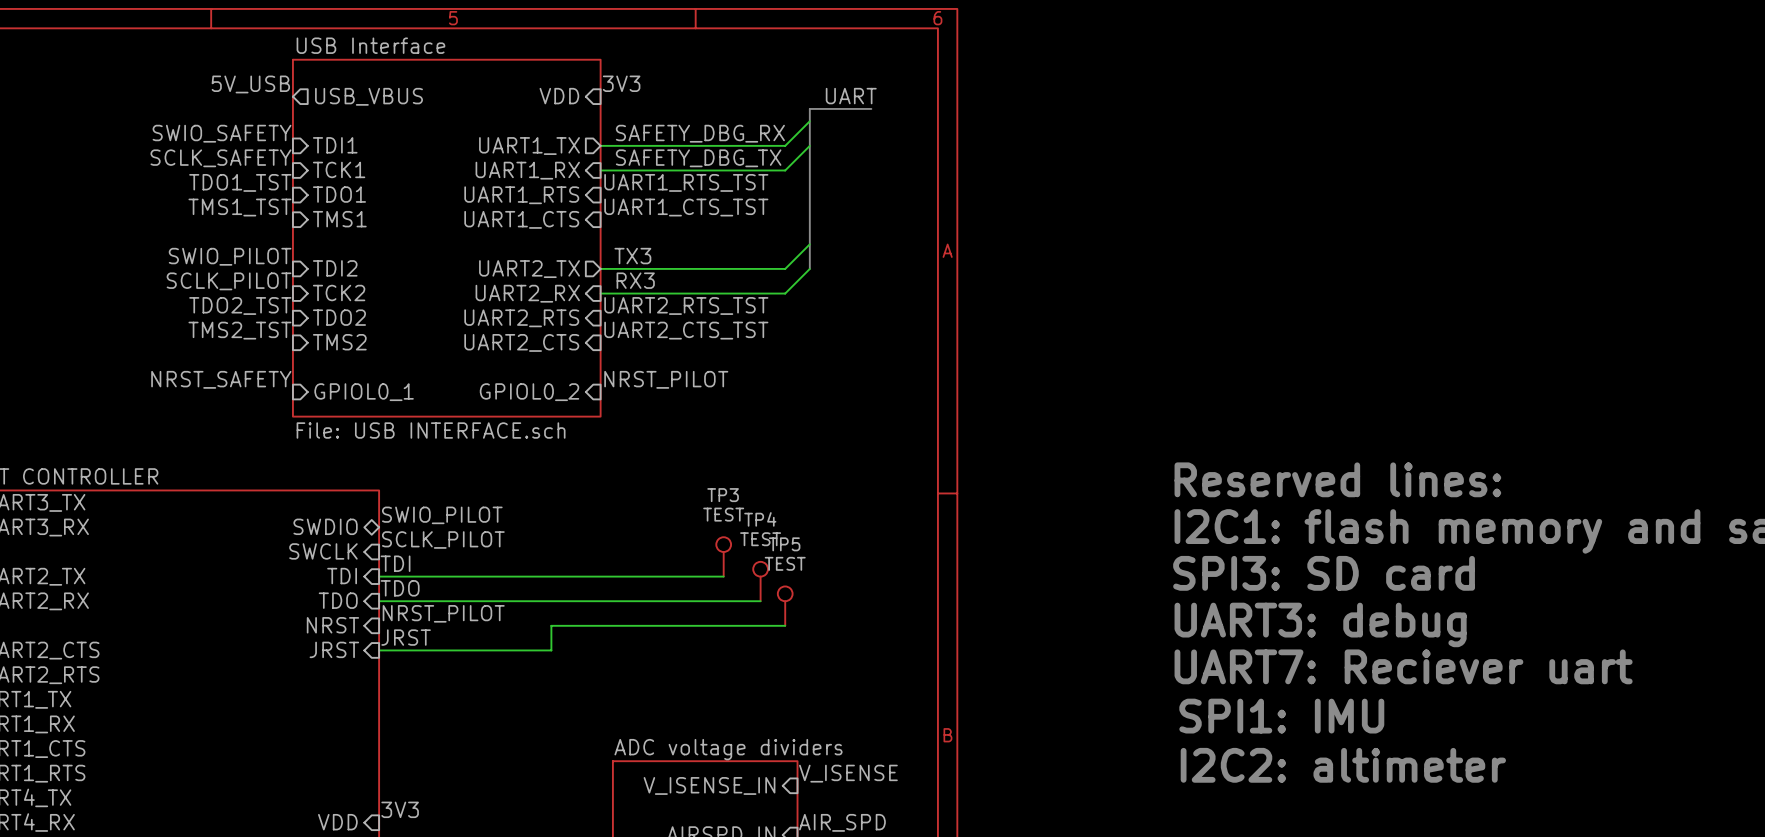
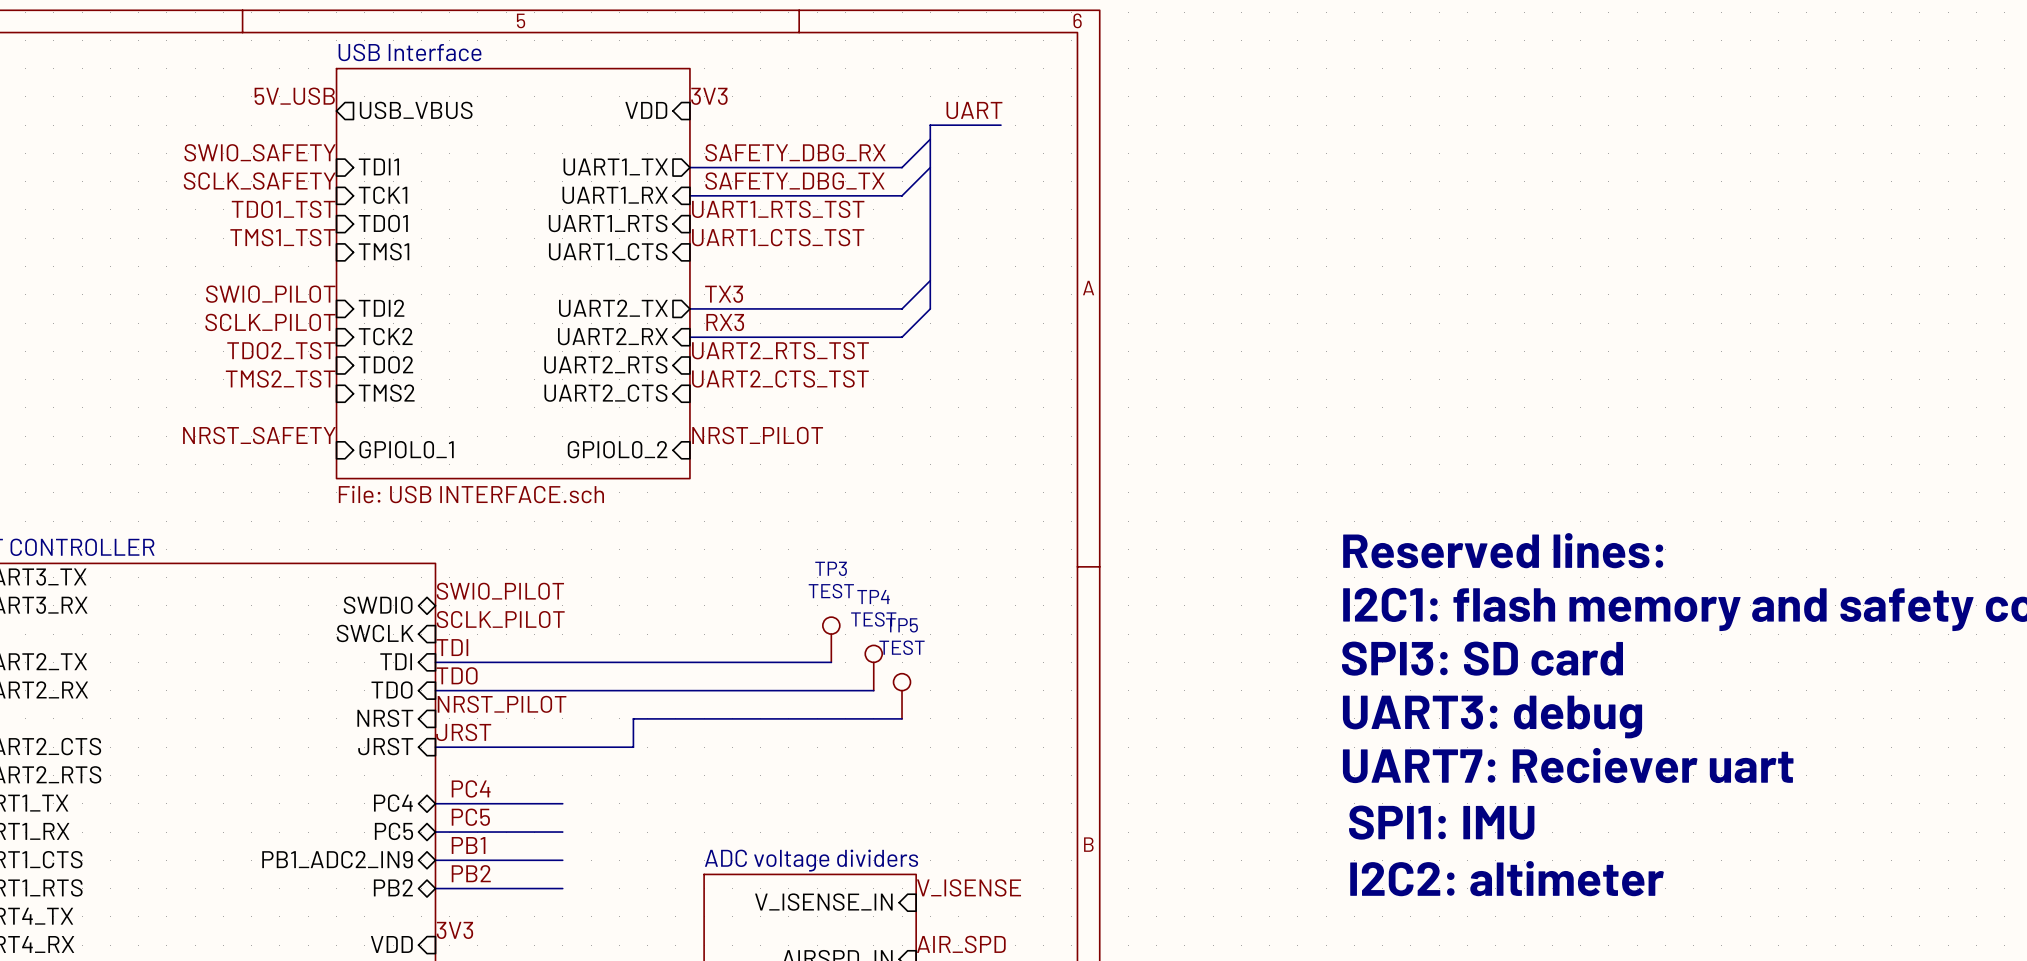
label: none -> PC4 (471, 788)
sheet pin: none -> PC4 (393, 803)
wire: none -> (435, 803) (562, 803)
label: none -> PC5 (470, 817)
sheet pin: none -> PC5 (393, 831)
wire: none -> (435, 832) (562, 832)
label: none -> PB1 (468, 845)
wire: none -> (435, 860) (562, 860)
sheet pin: none -> PB1_ADC2_IN9 (337, 859)
label: none -> PB2 (471, 873)
sheet pin: none -> PB2 (393, 887)
wire: none -> (435, 888) (562, 888)

